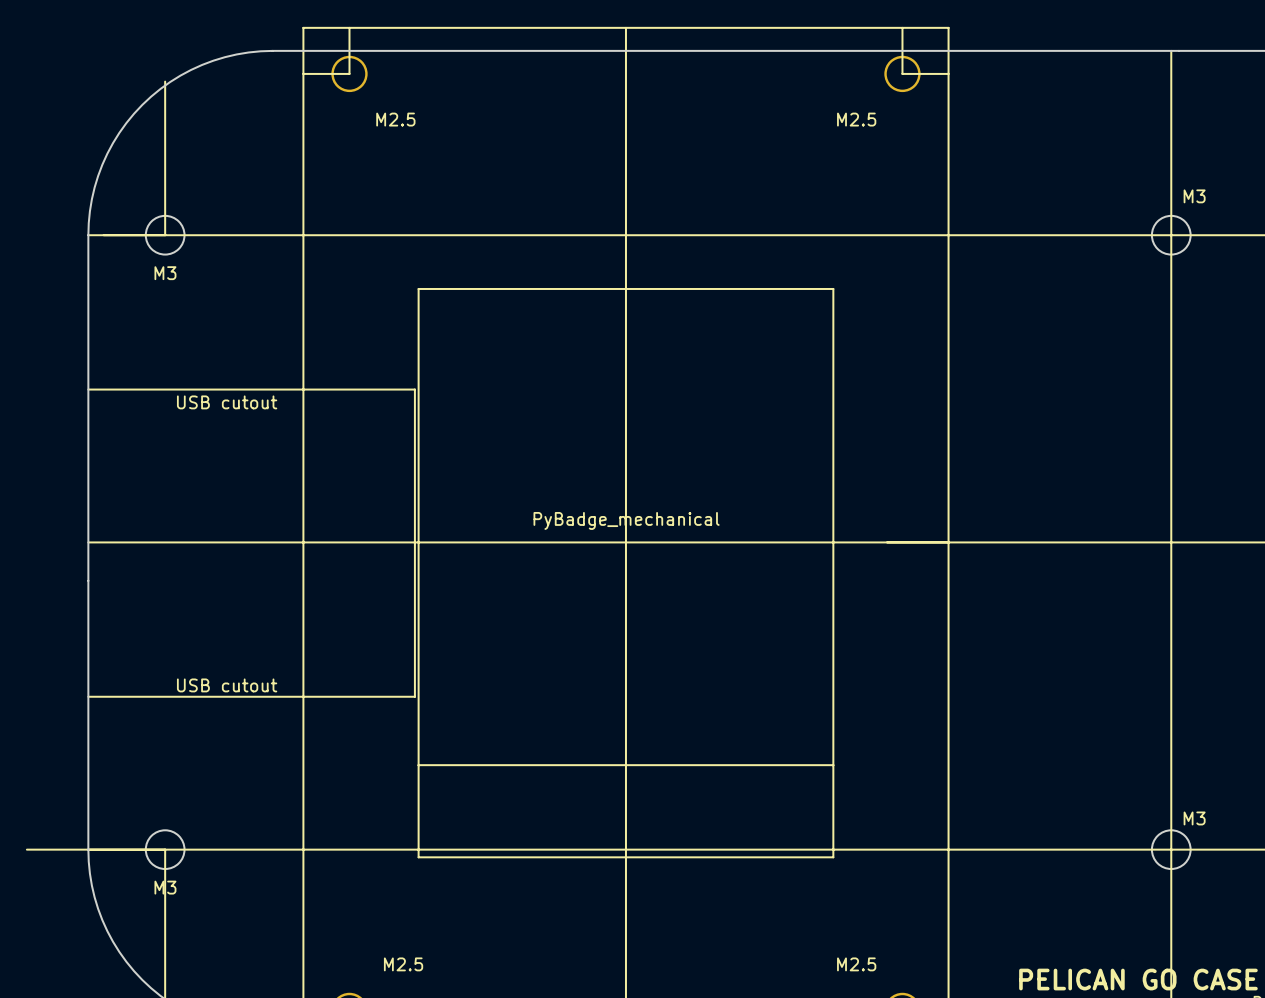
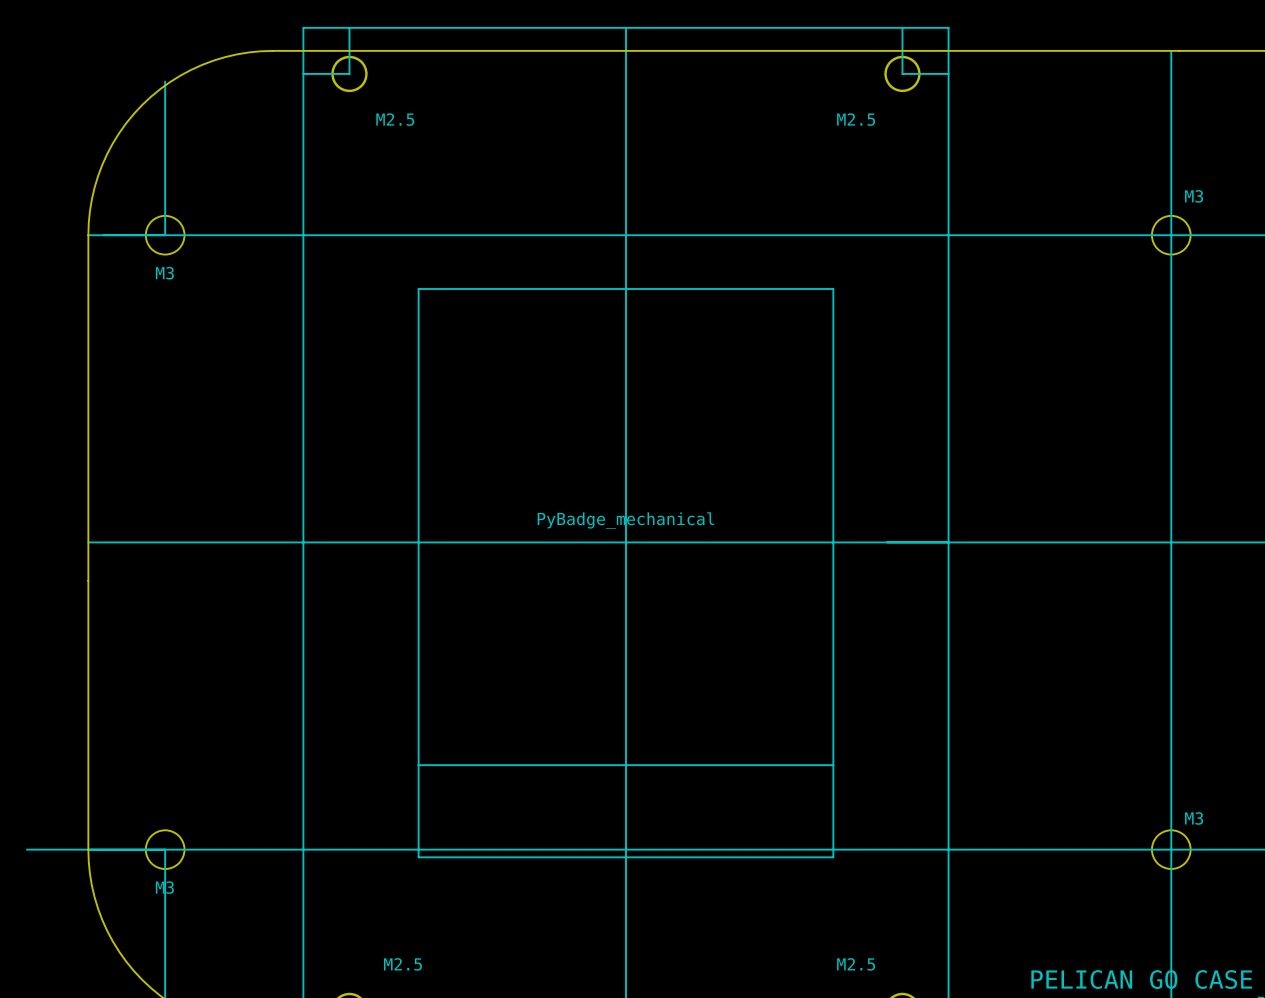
line: (88, 389) (414, 389) (414, 696) (88, 696) -> none
text: USB cutout (227, 402) -> none
text: USB cutout (227, 685) -> none

